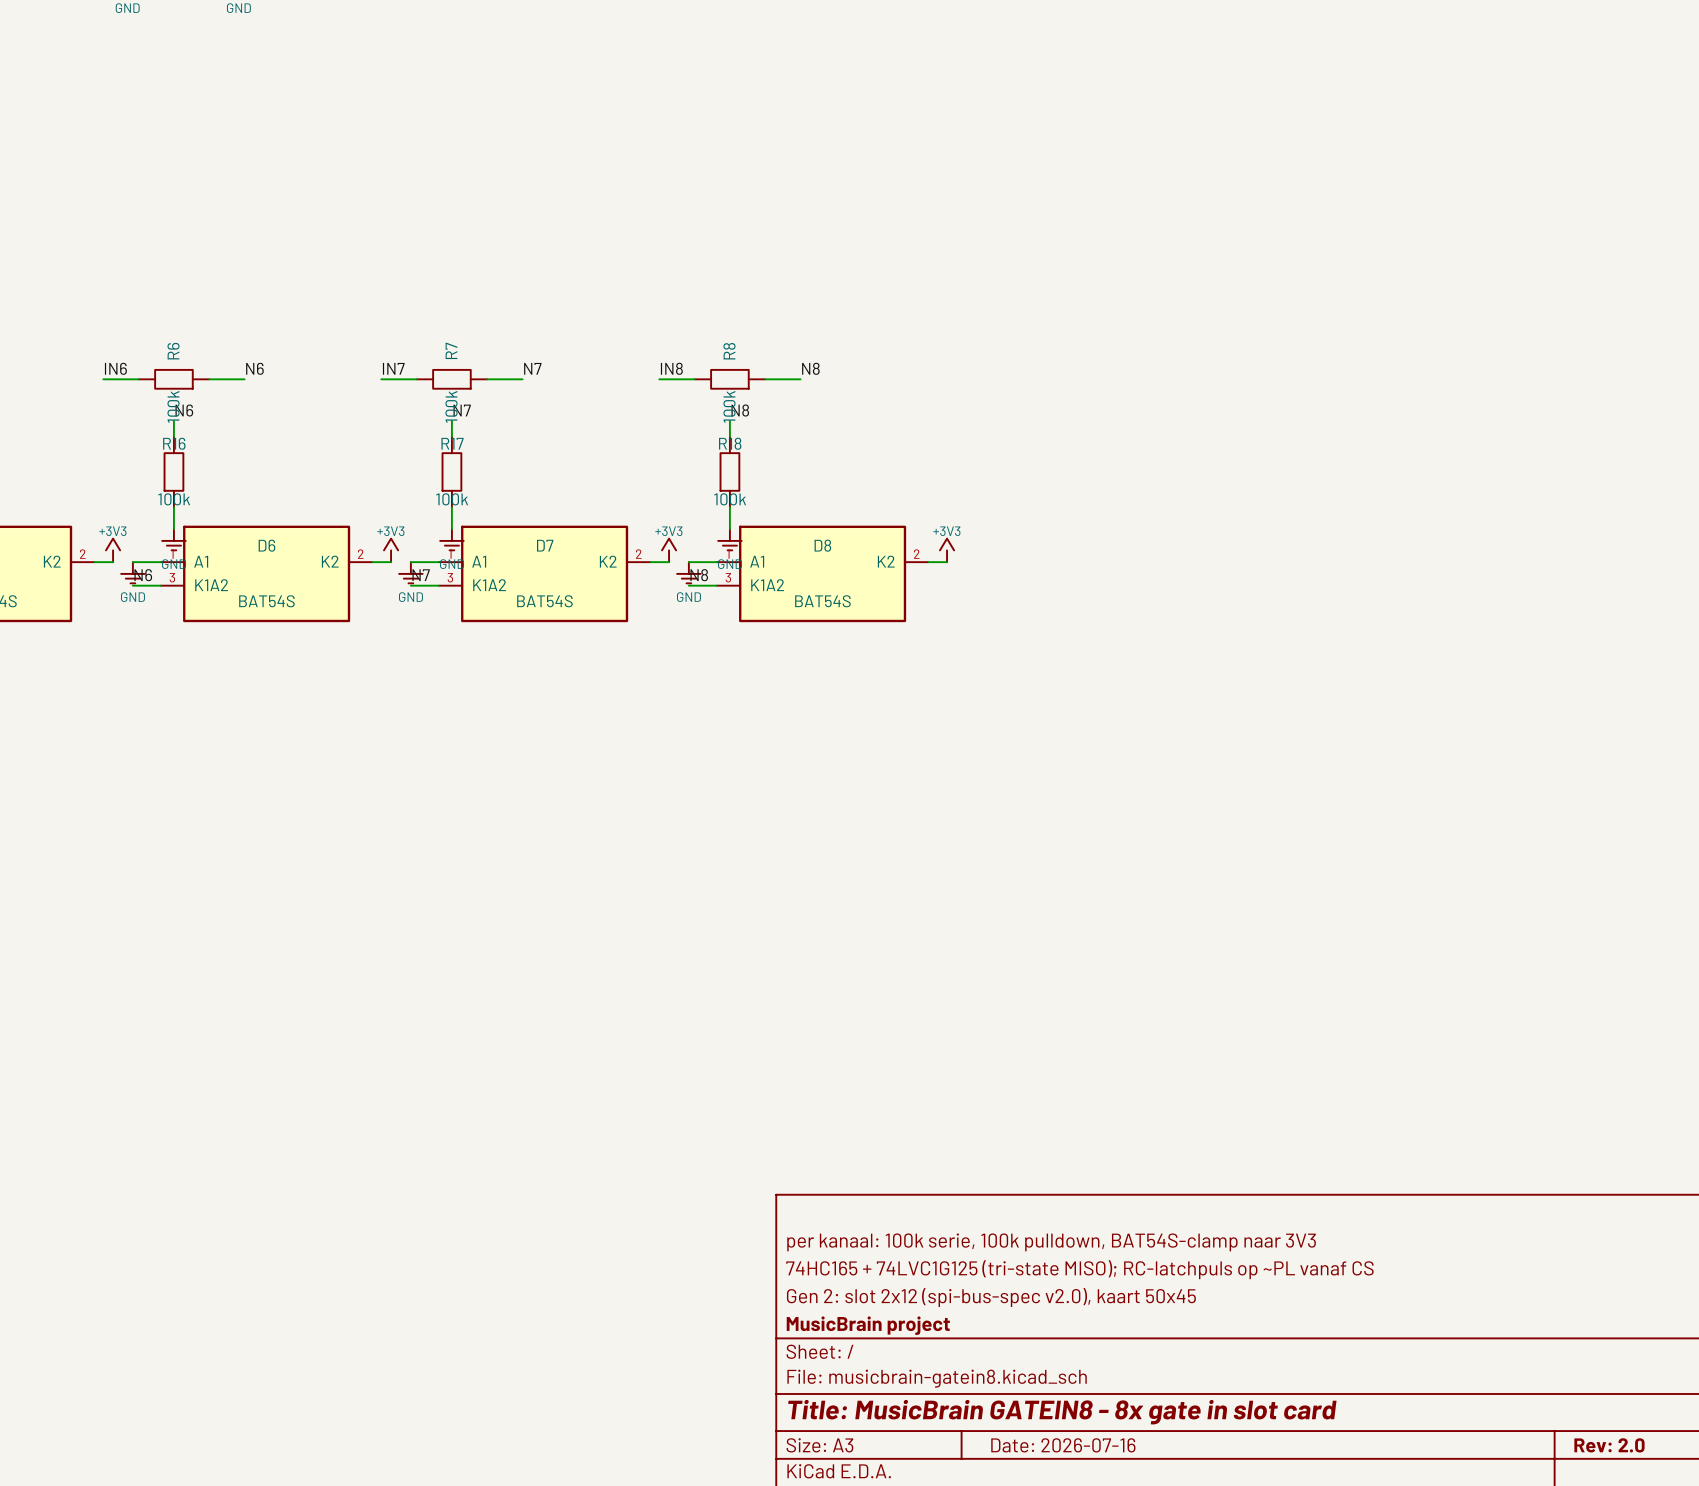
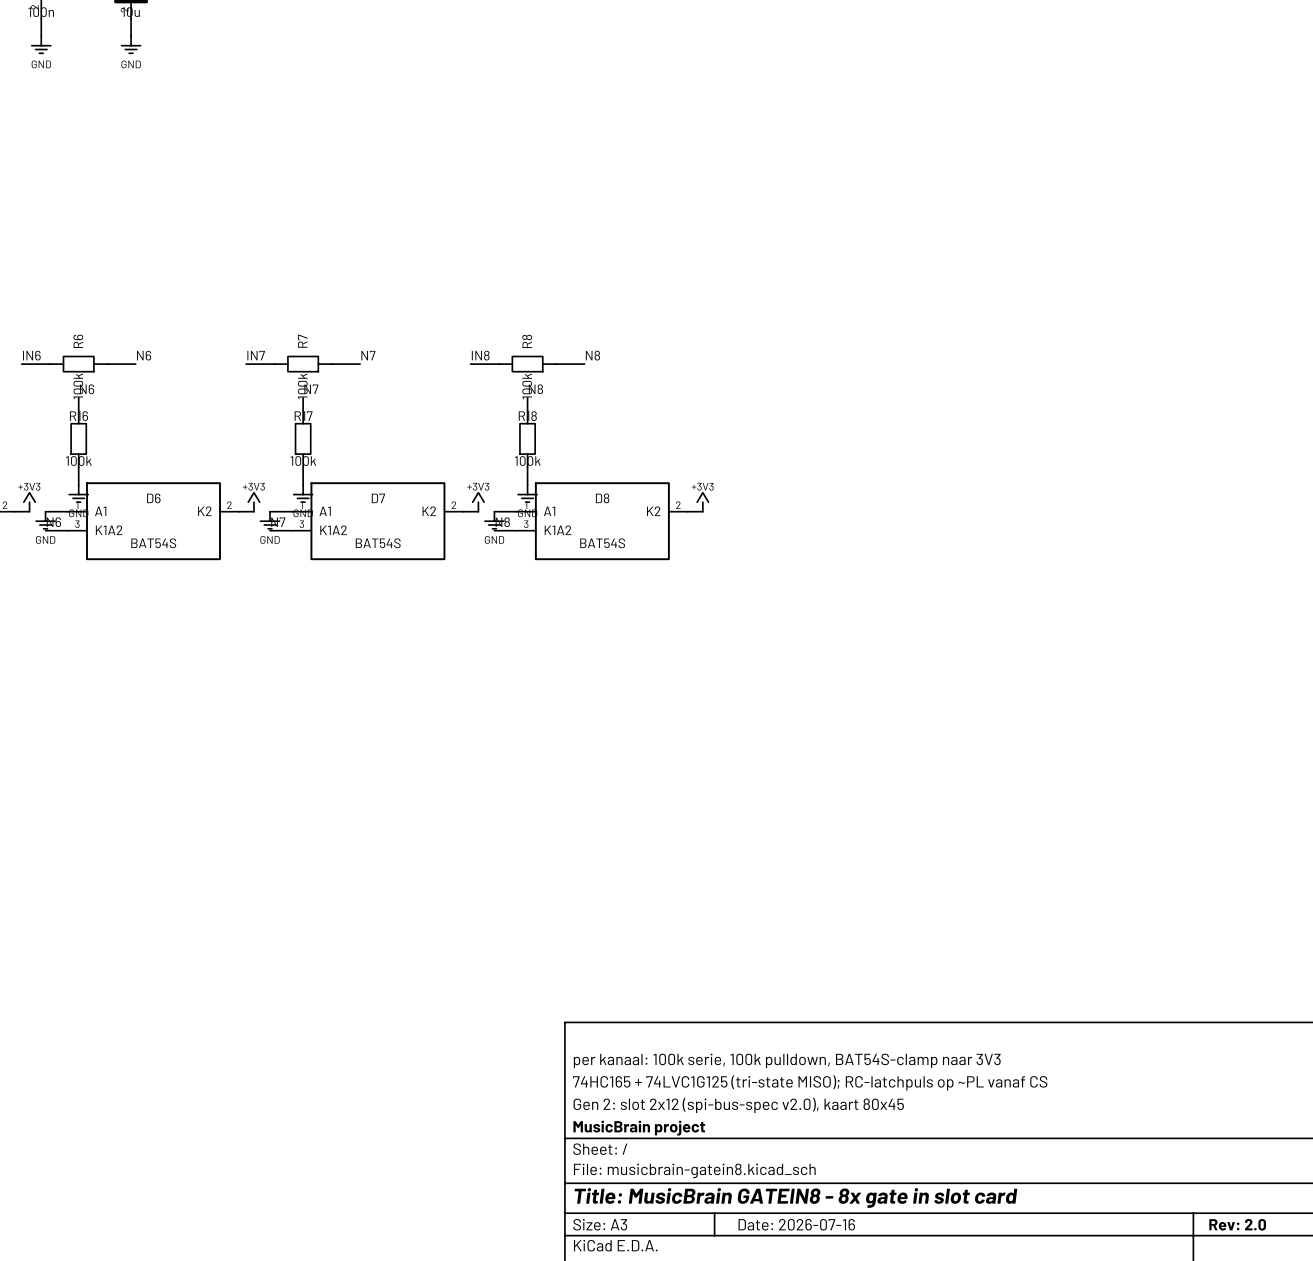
title block: Gen 2: slot 2x12 (spi-bus-spec v2.0), kaart 50x45 (991, 1297) -> Gen 2: slot 2x12 (spi-bus-spec v2.0), kaart 80x45 (738, 1105)

